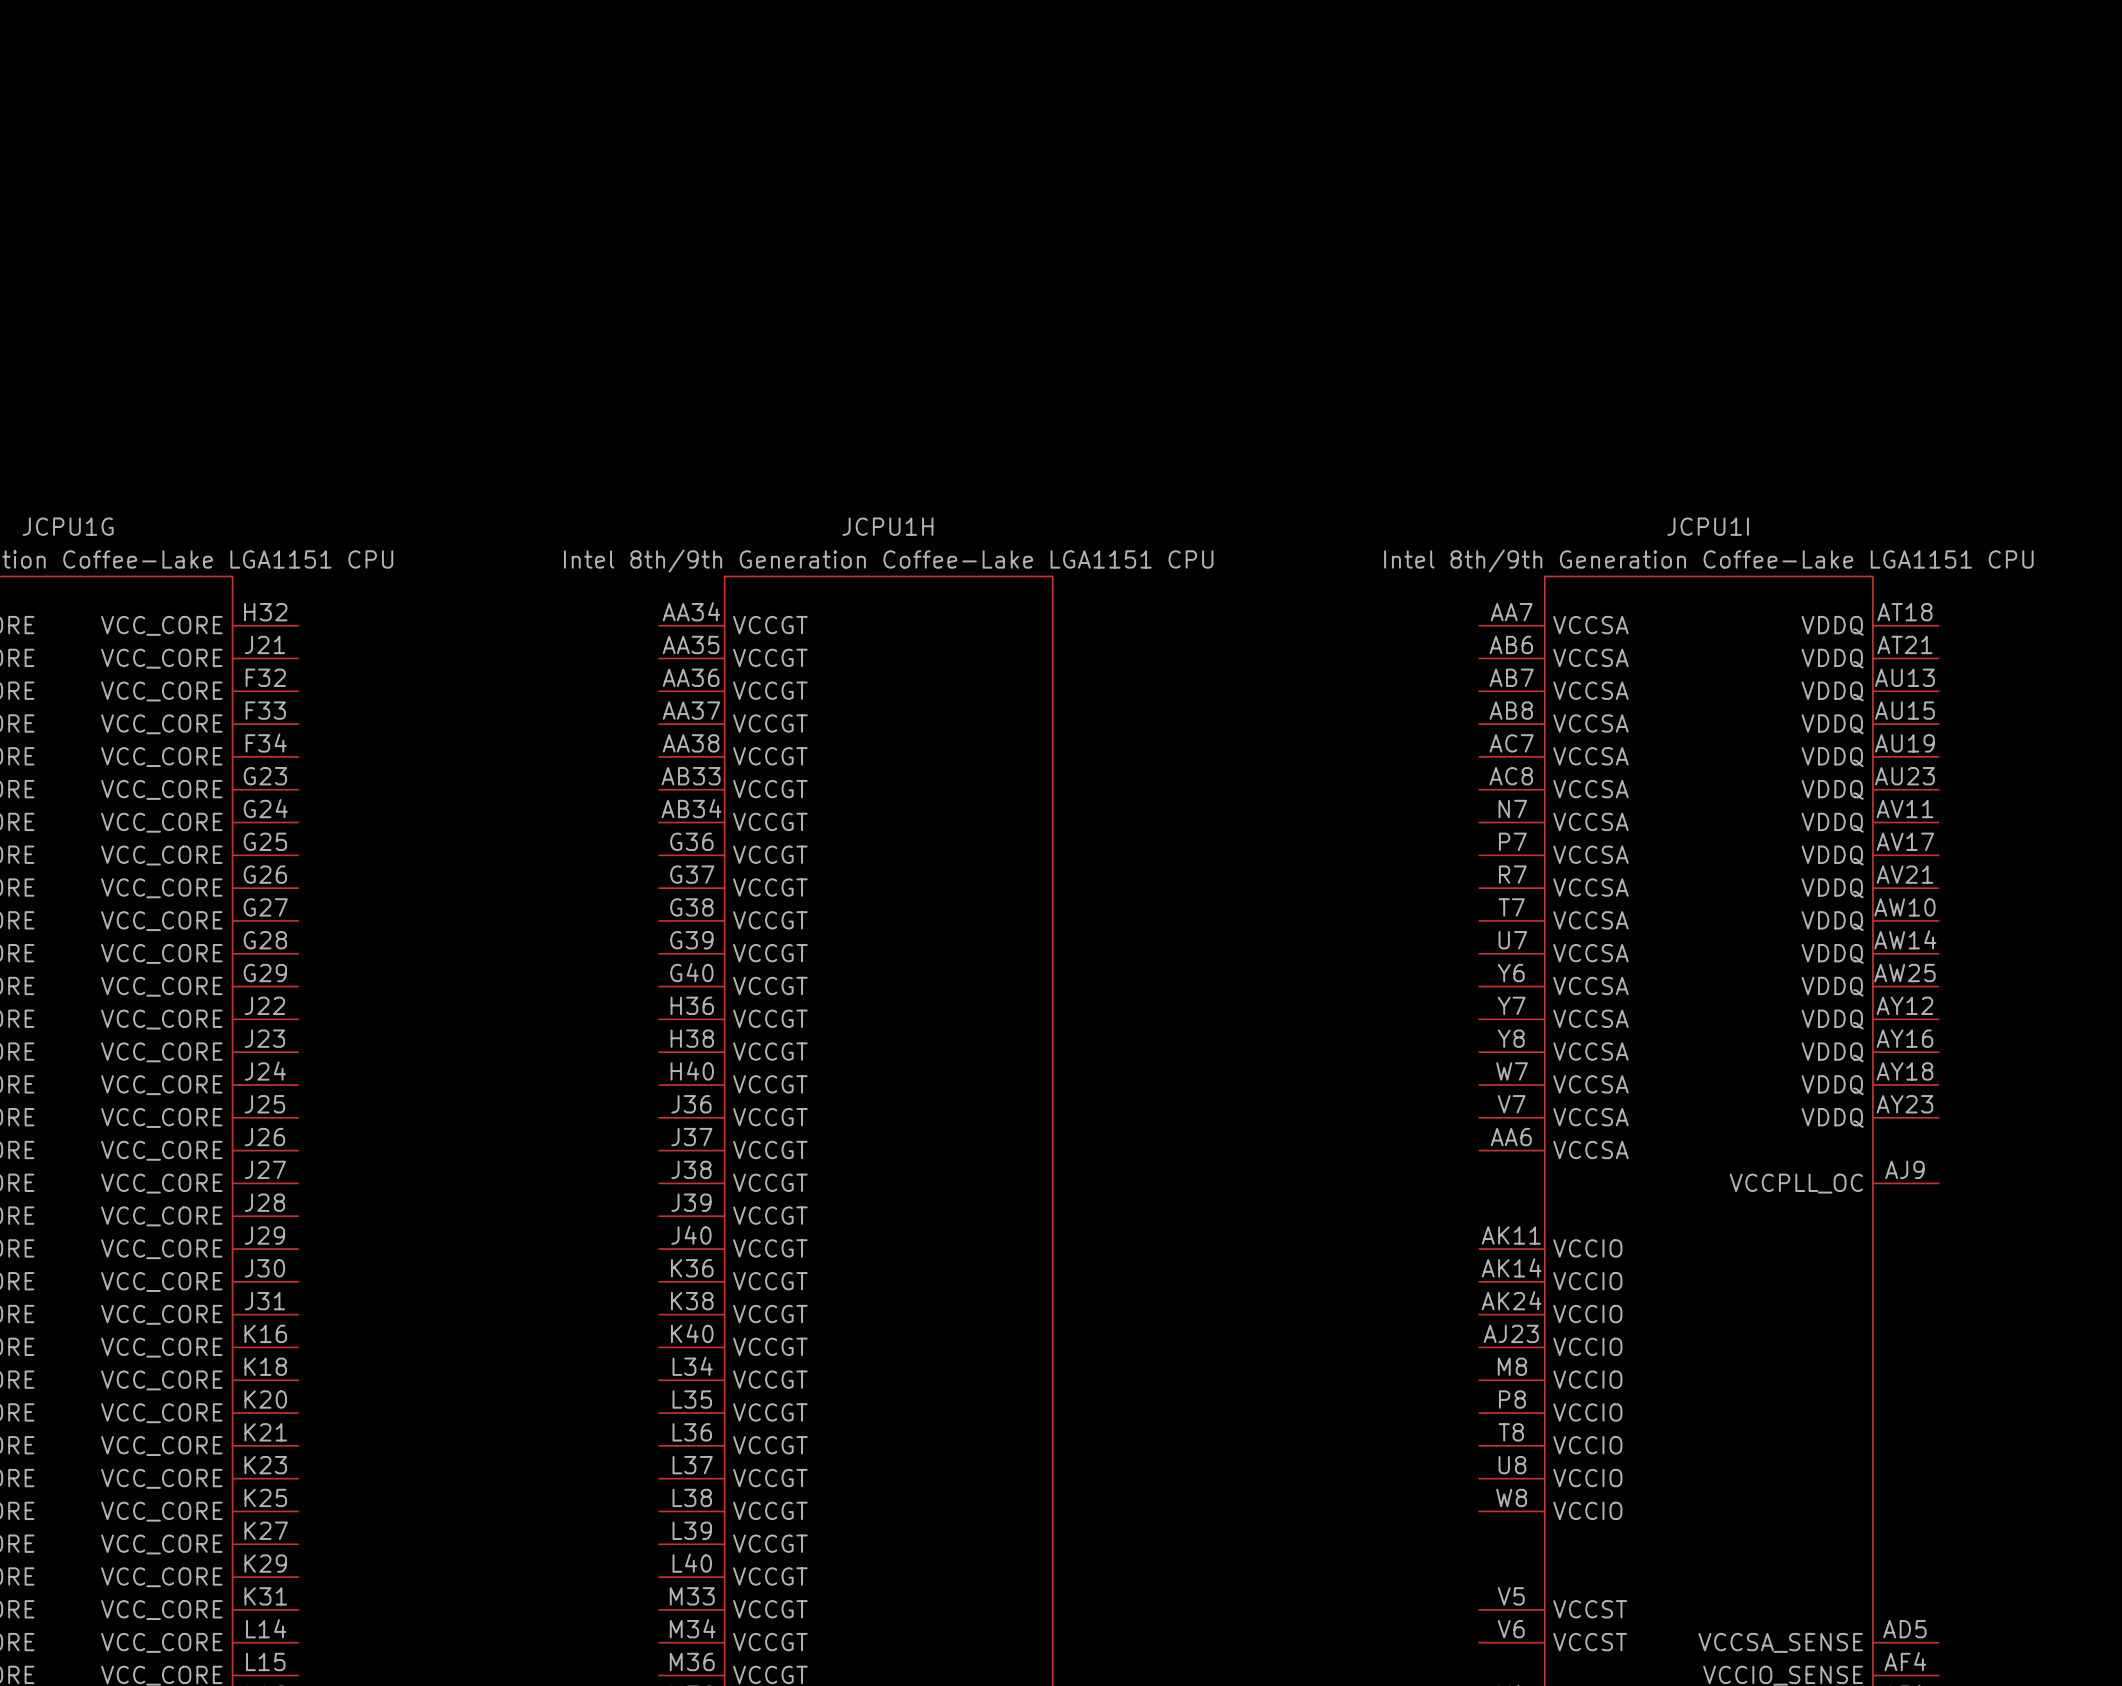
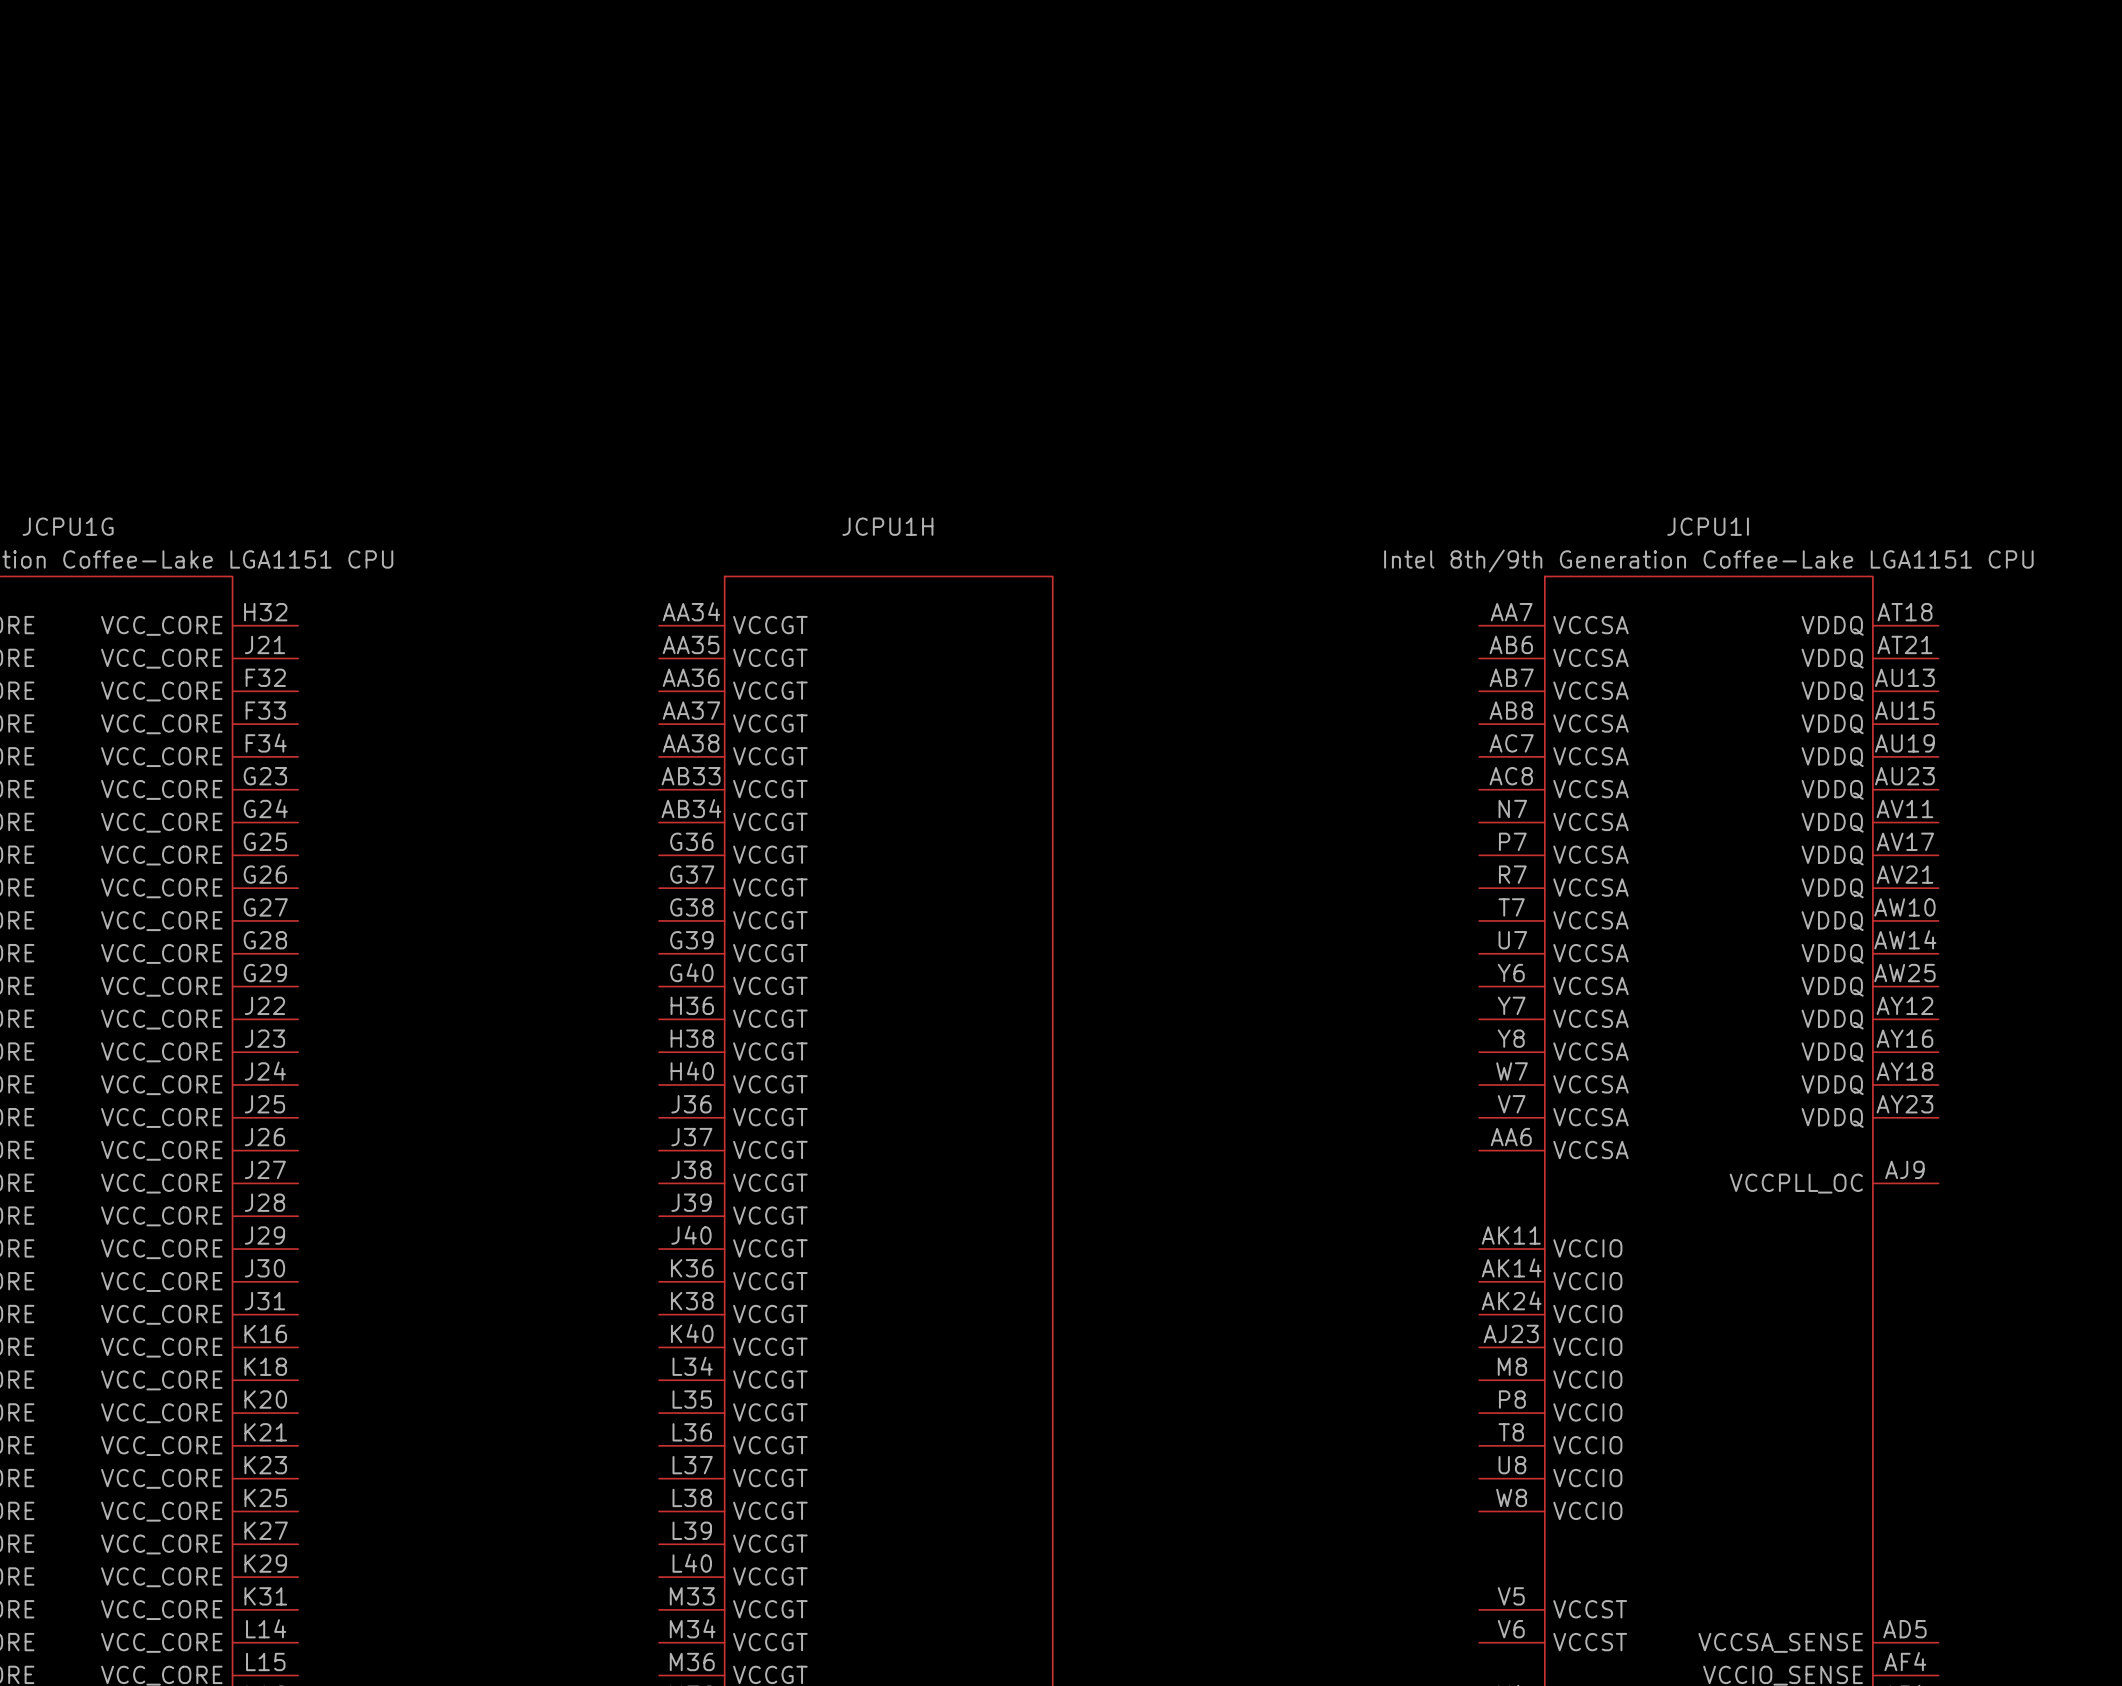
JCPU1H value: Intel 8th/9th Generation Coffee-Lake LGA1151 CPU (888, 561) -> none

